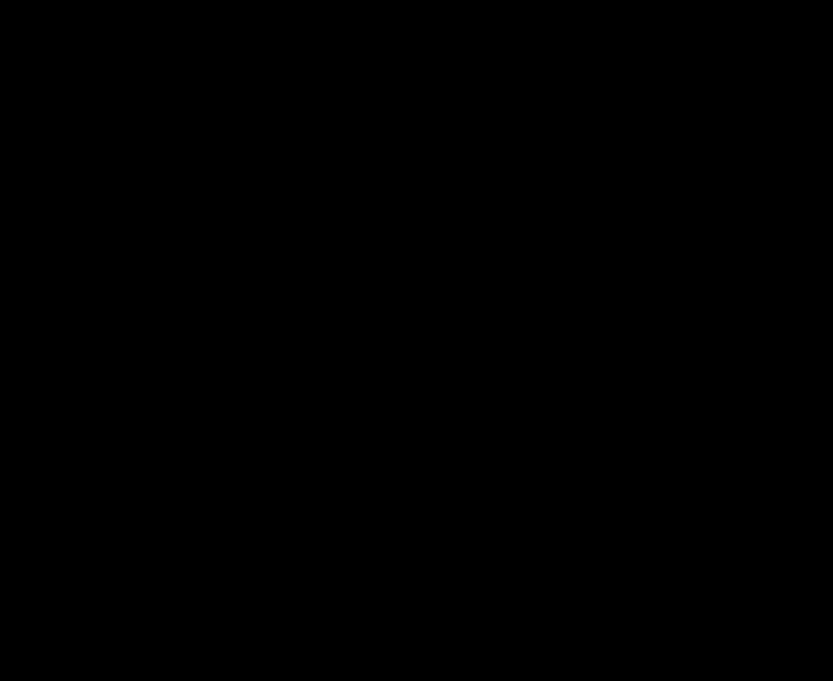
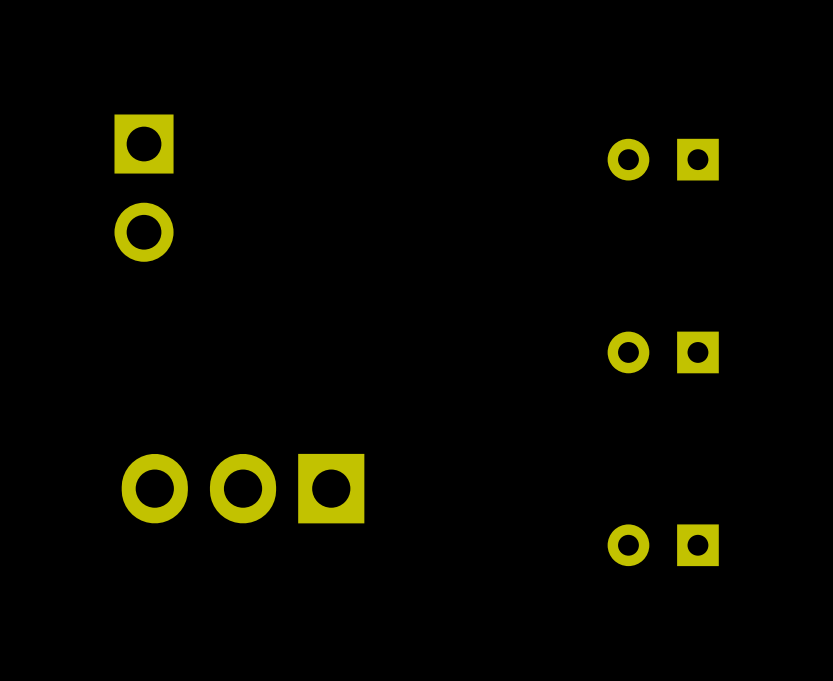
part: none -> (663, 159)
part: none -> (144, 188)
part: none -> (663, 352)
part: none -> (243, 488)
part: none -> (663, 545)

